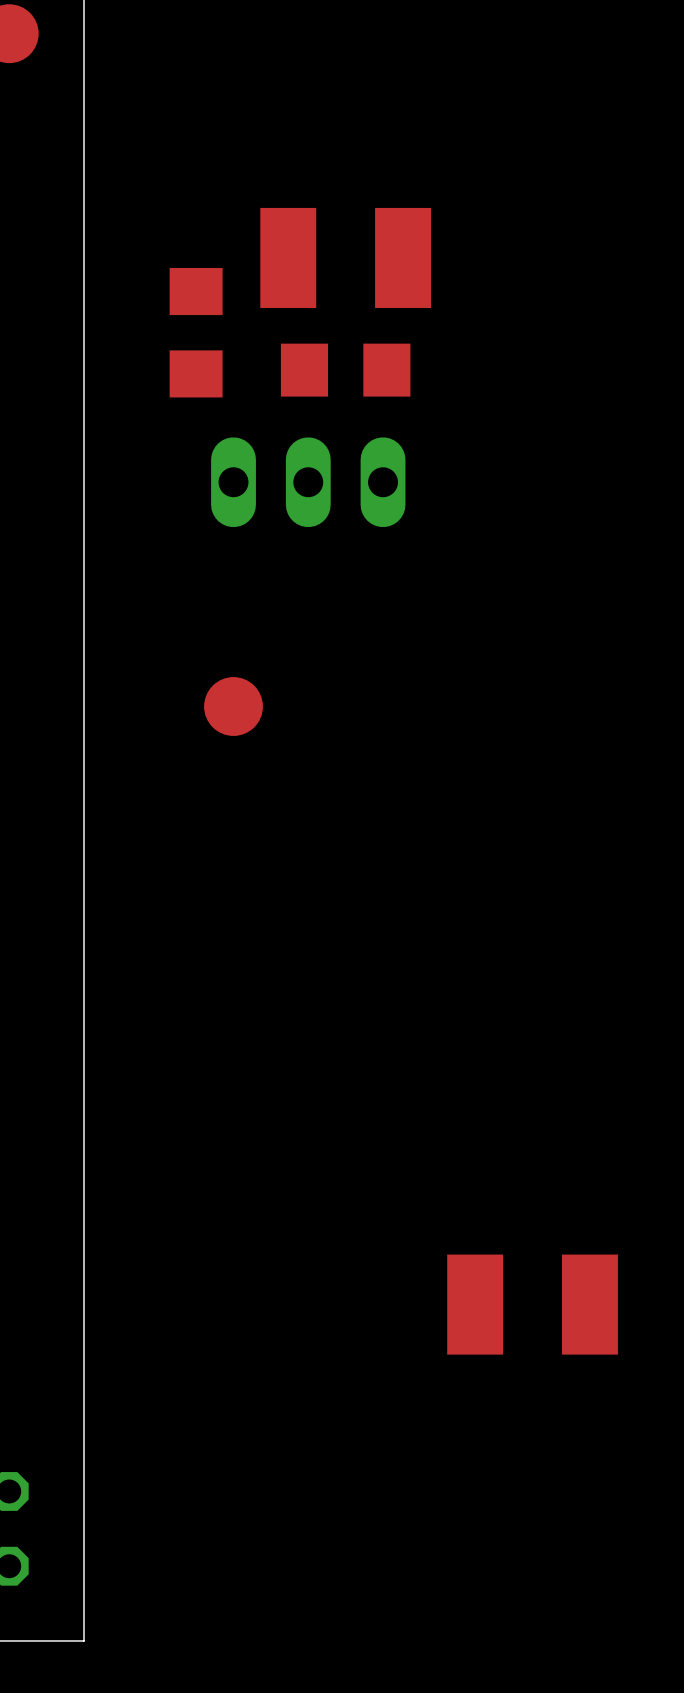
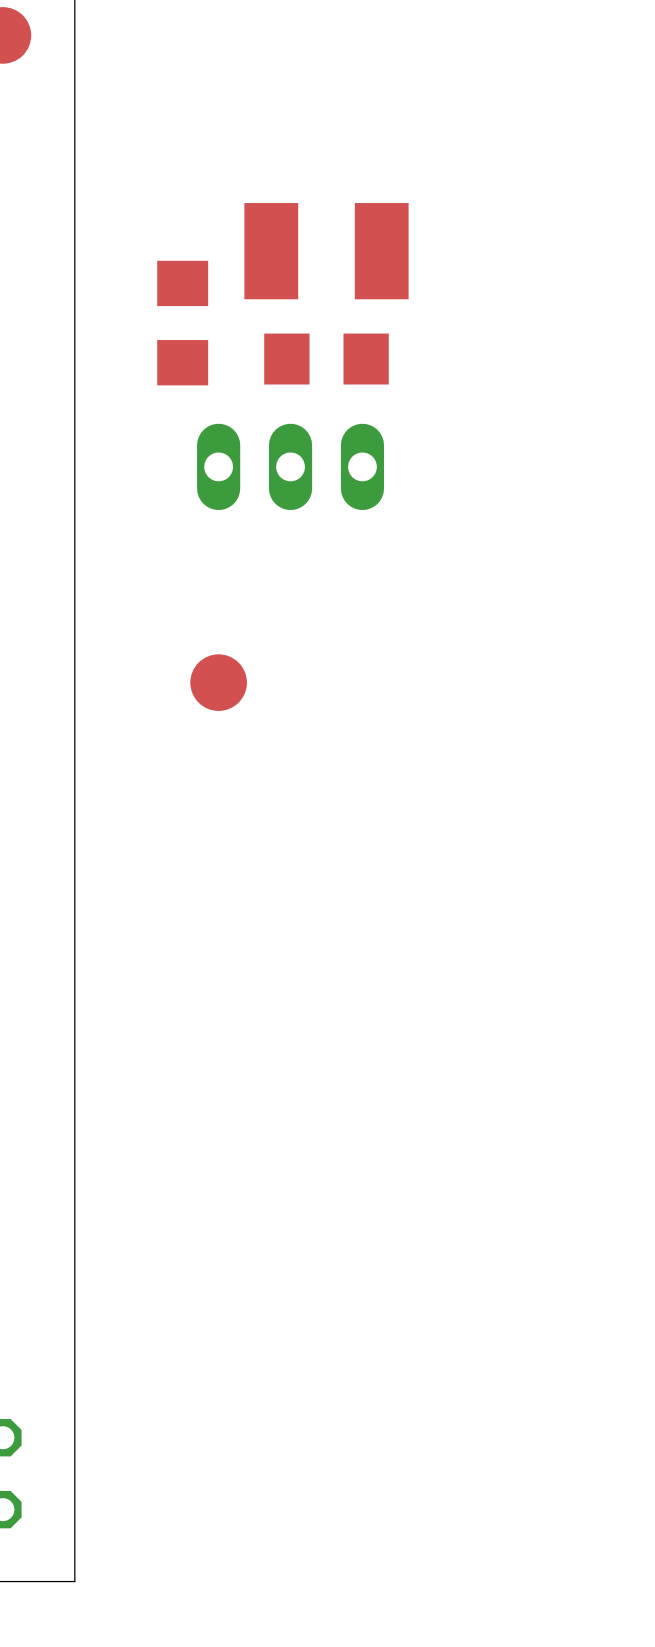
part: (532, 1304) -> none

